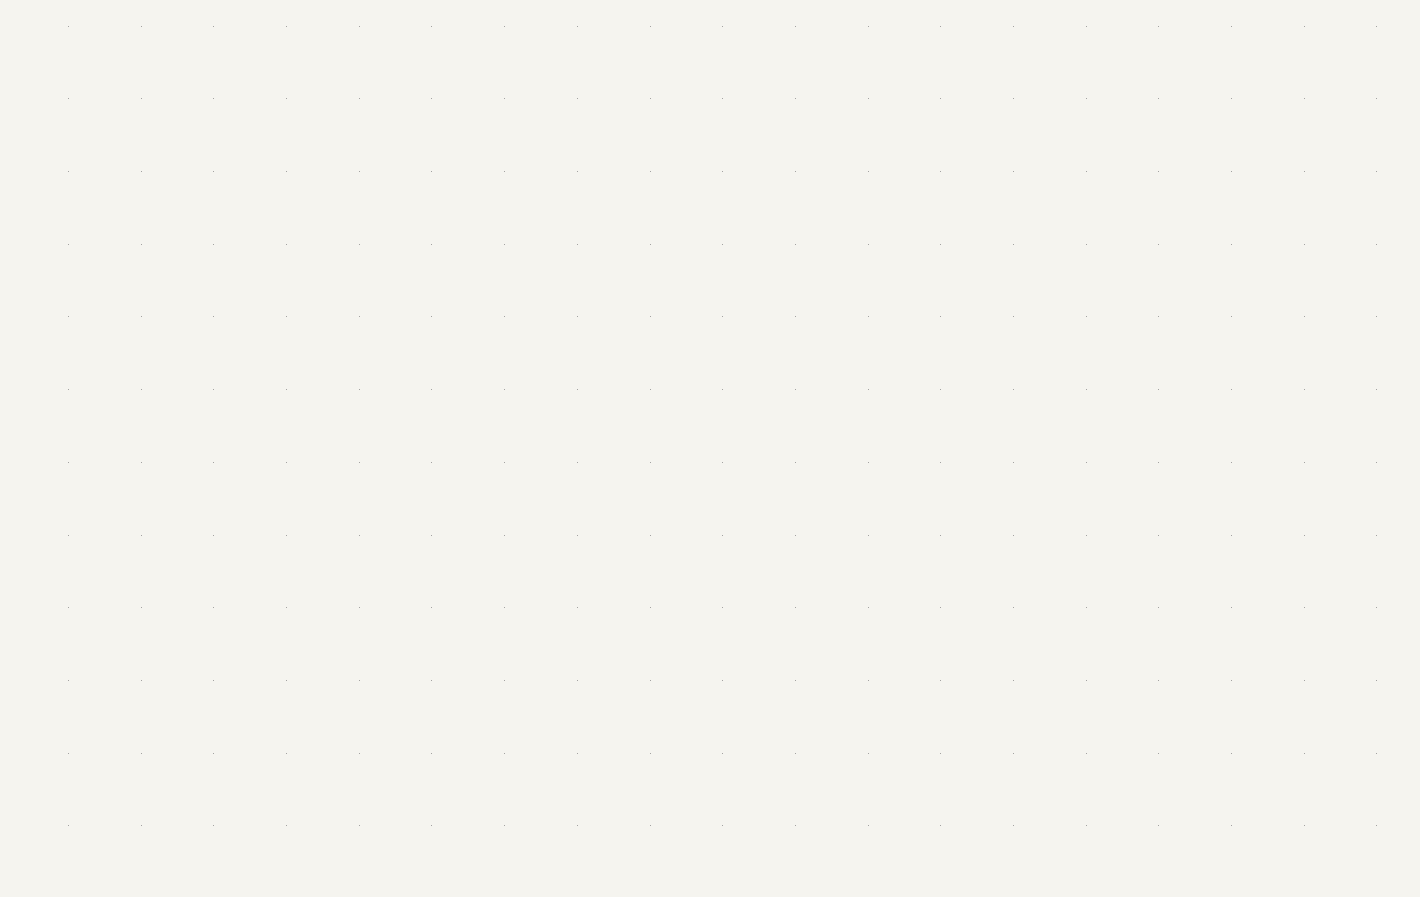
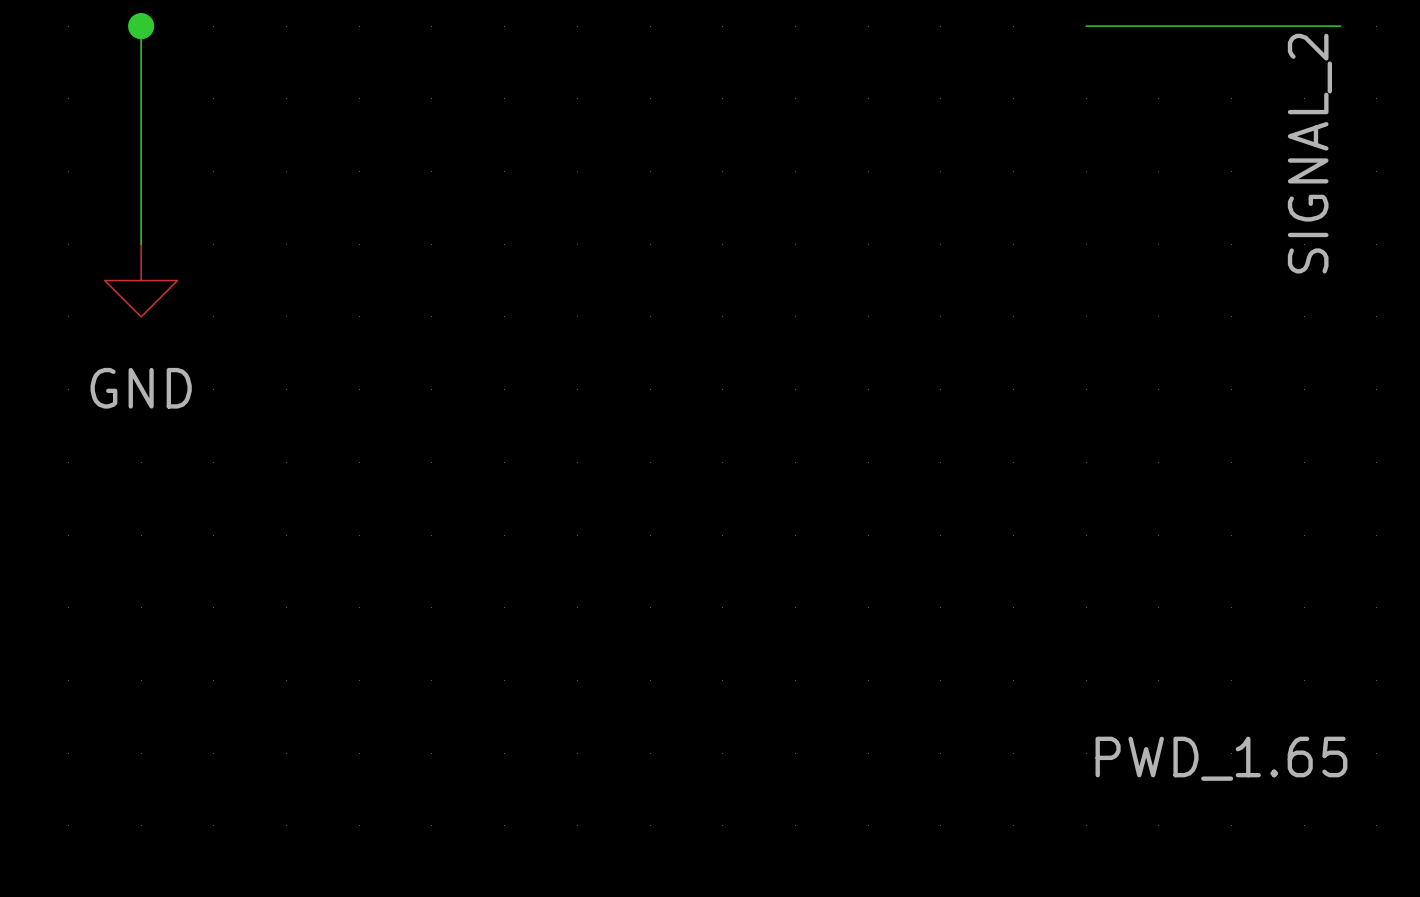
wire: none -> (141, 26) (141, 244)
junction: none -> (141, 26)
wire: none -> (1086, 26) (1340, 26)
label: none -> SIGNAL_2 (1309, 153)
power symbol: none -> GND (141, 280)
label: none -> PWD_1.65 (1221, 758)

